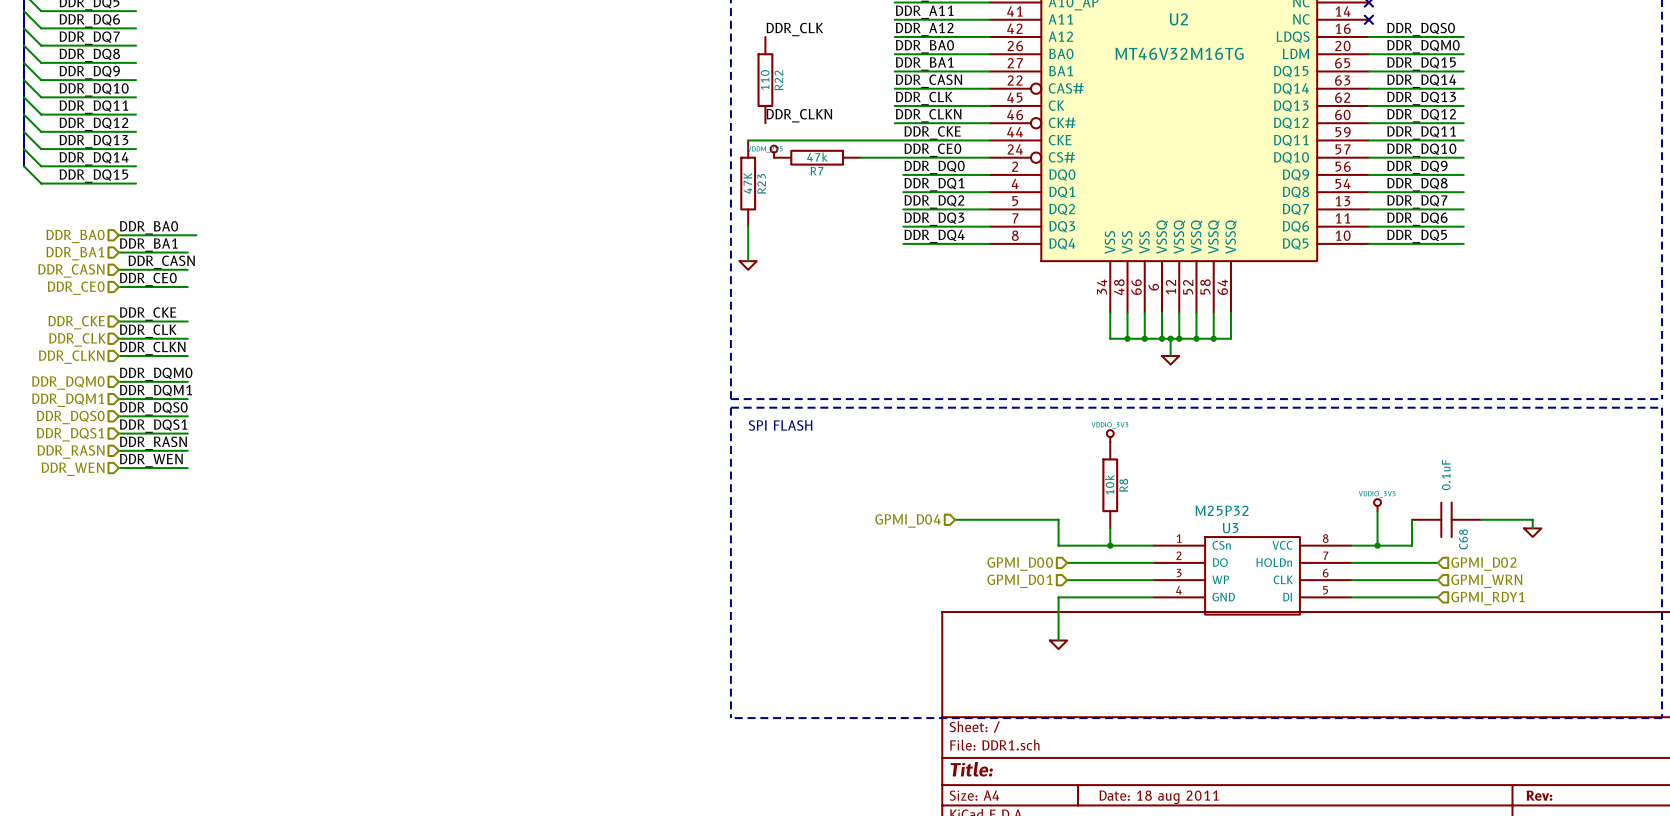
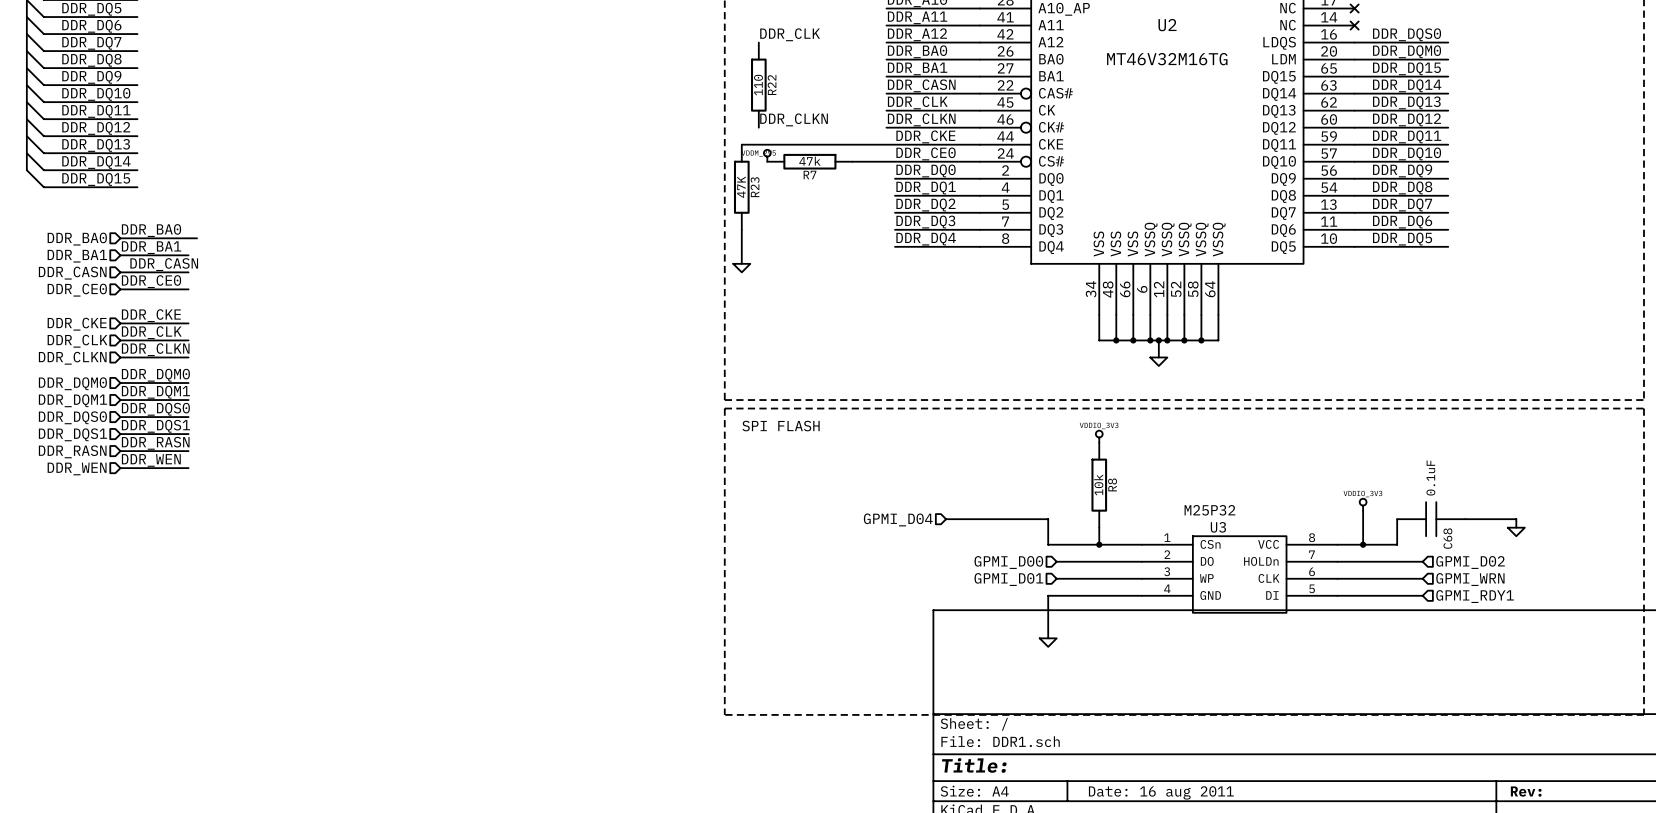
title block: Date: 18 aug 2011 (1159, 797) -> Date: 16 aug 2011 (1161, 792)

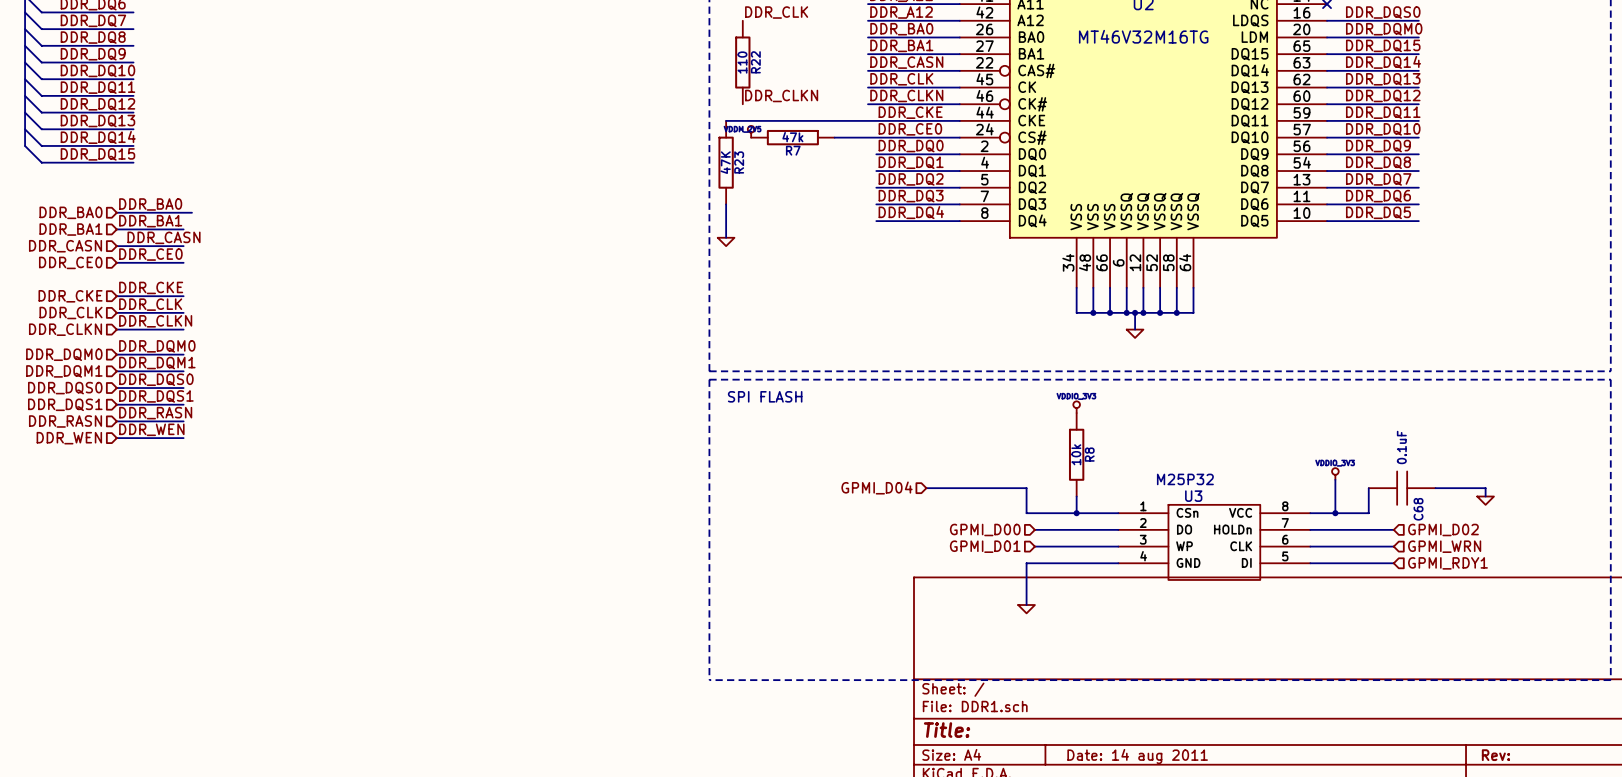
title block: Date: 16 aug 2011 (1161, 792) -> Date: 14 aug 2011 (1137, 756)

